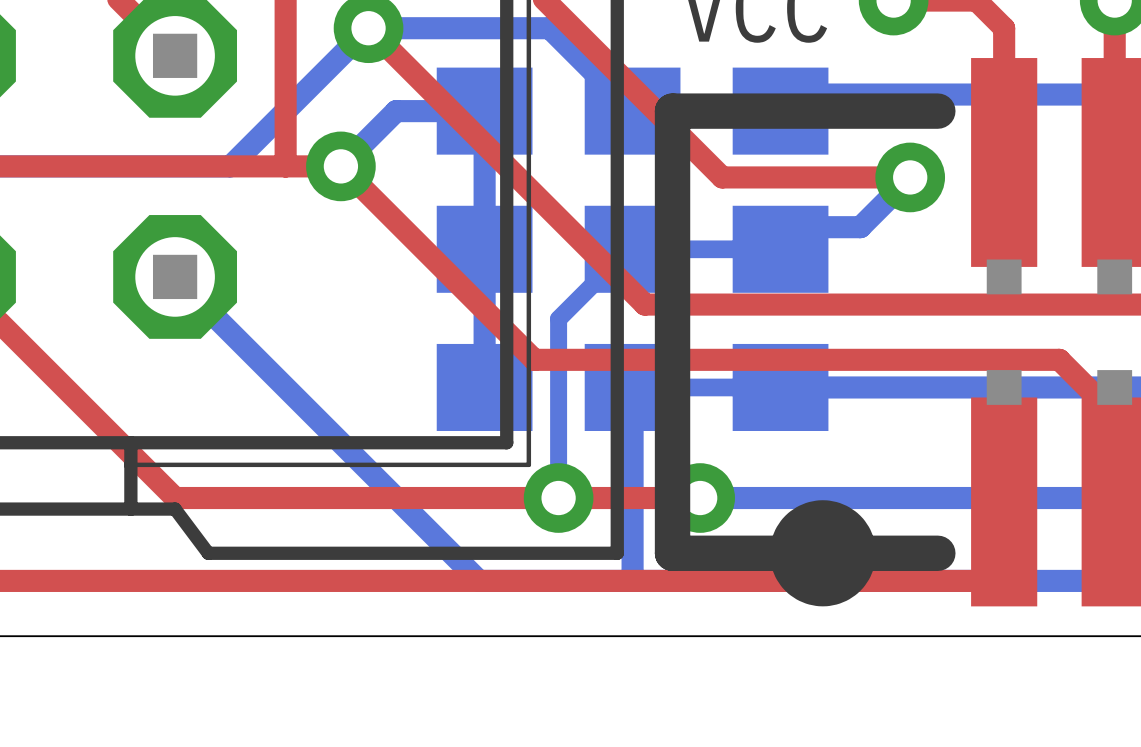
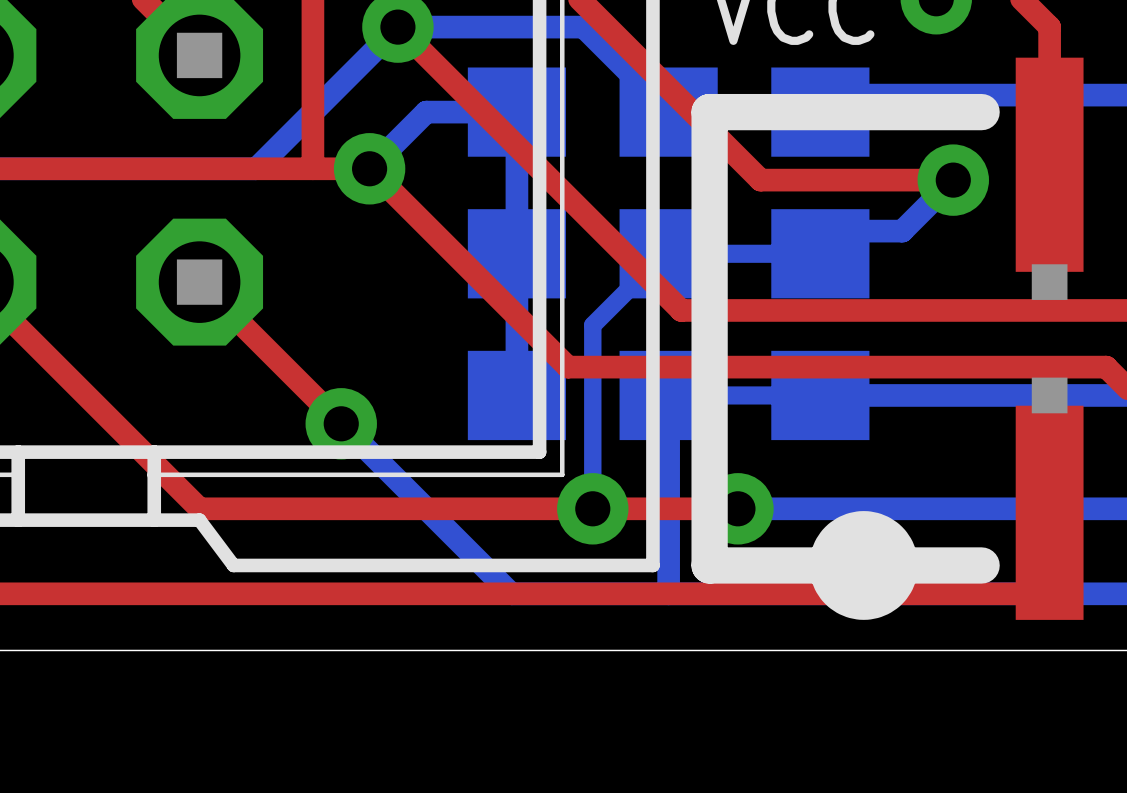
top track: none -> (199, 282) (341, 423)
bottom track: (175, 276) (313, 415) -> none
via: none -> (341, 423)

